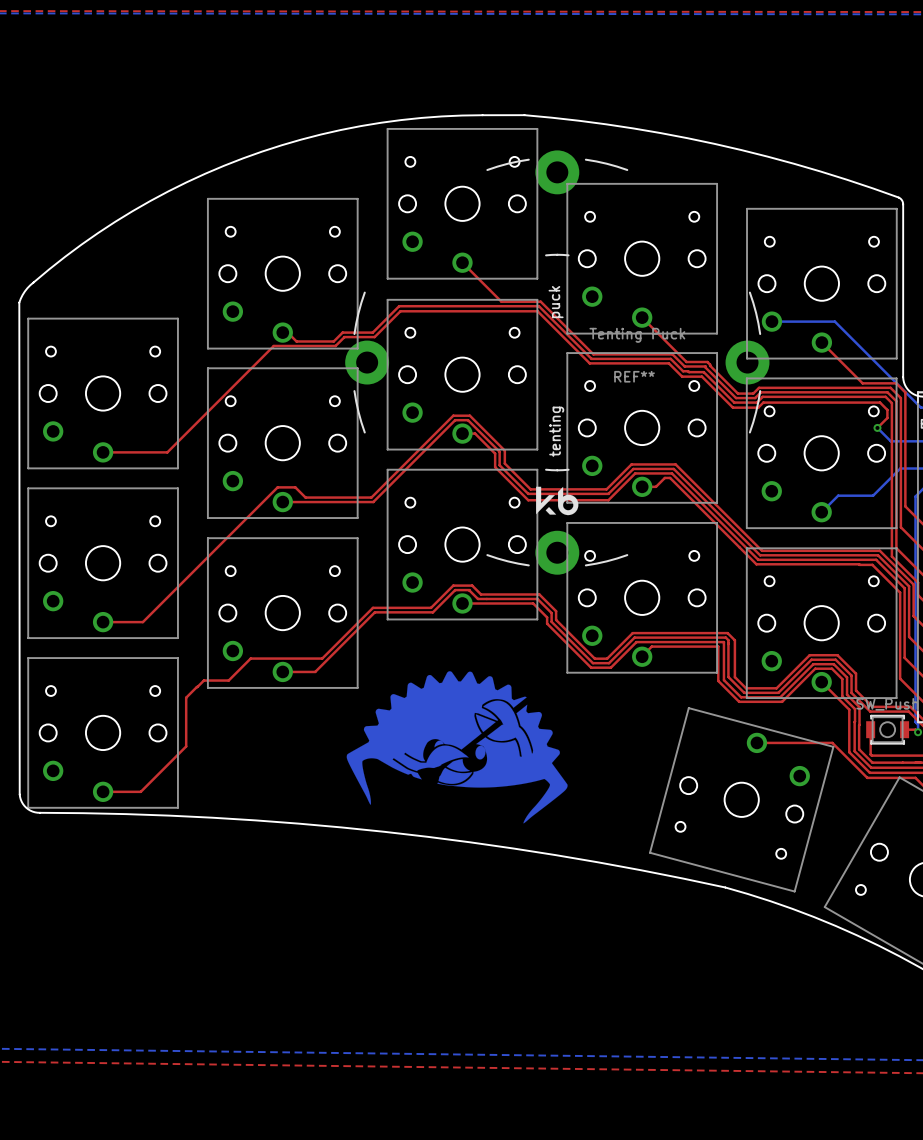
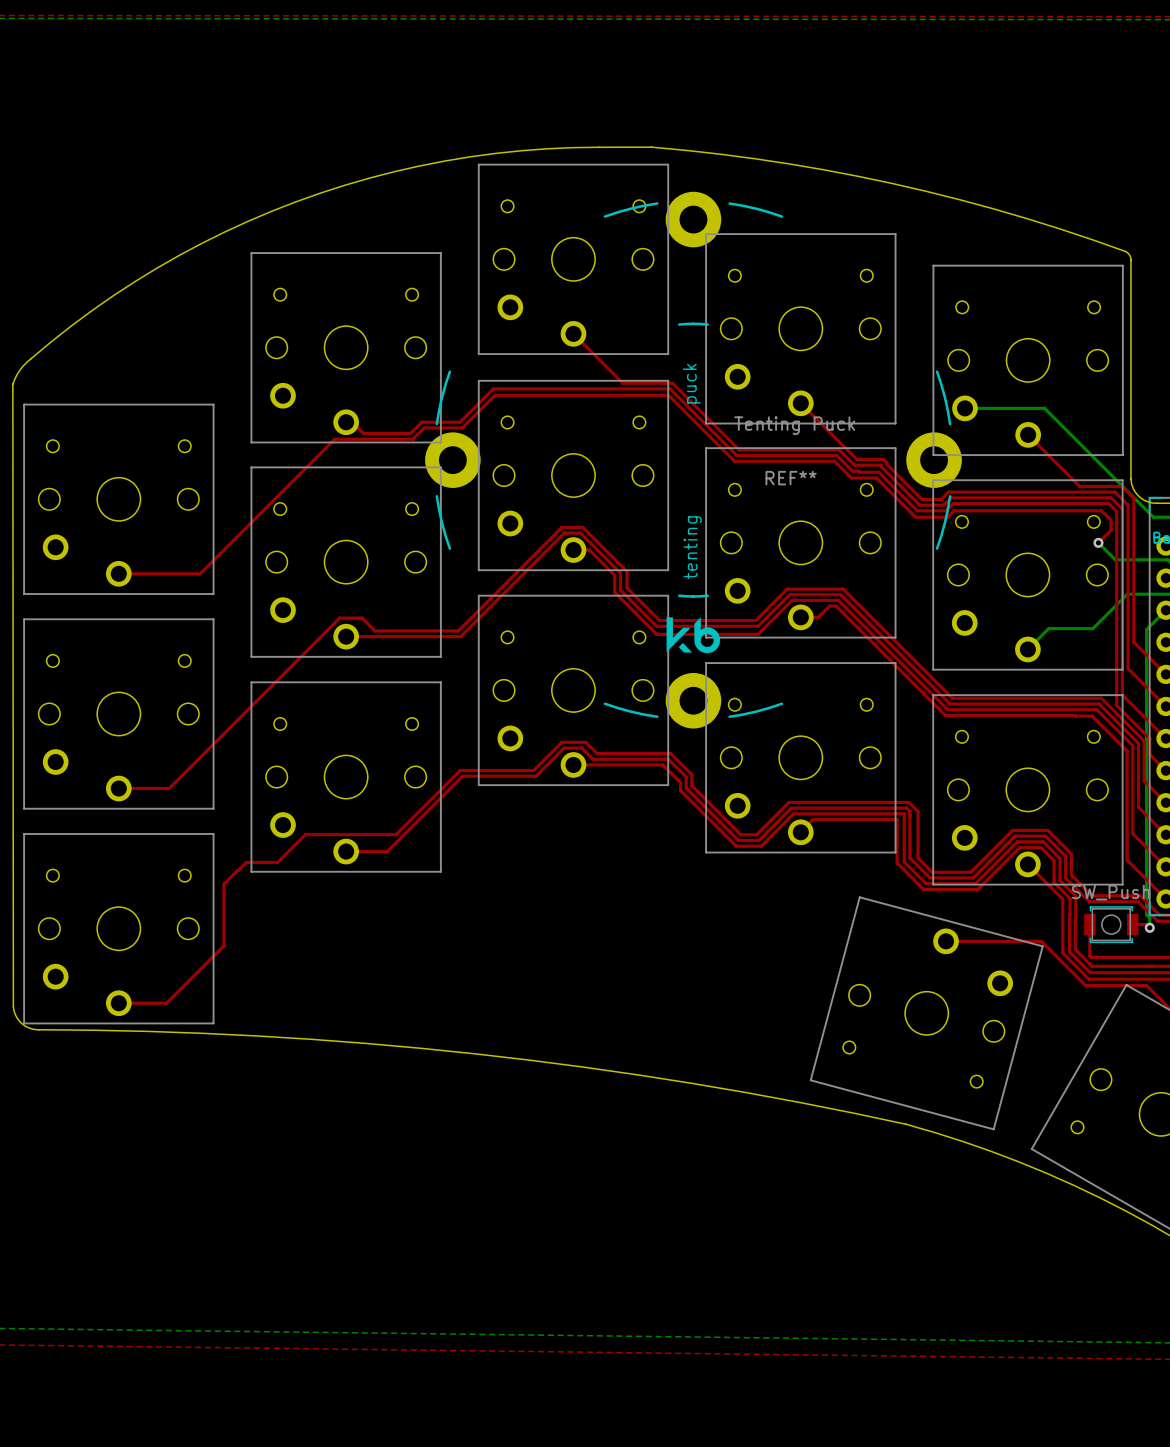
drawing: [346, 671, 568, 824] -> none

